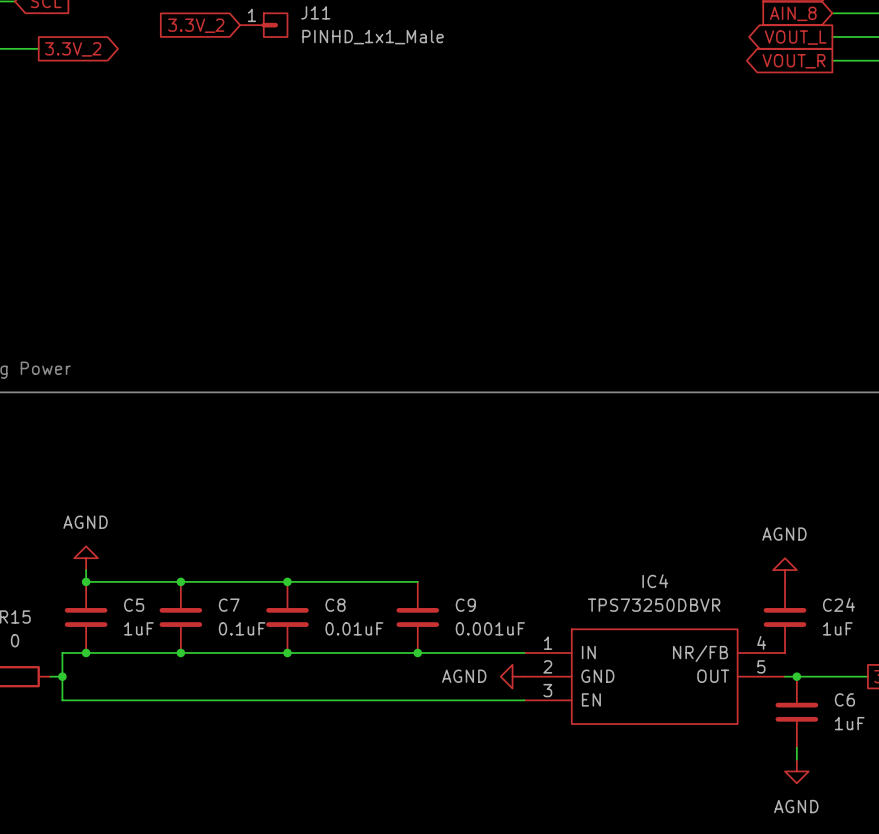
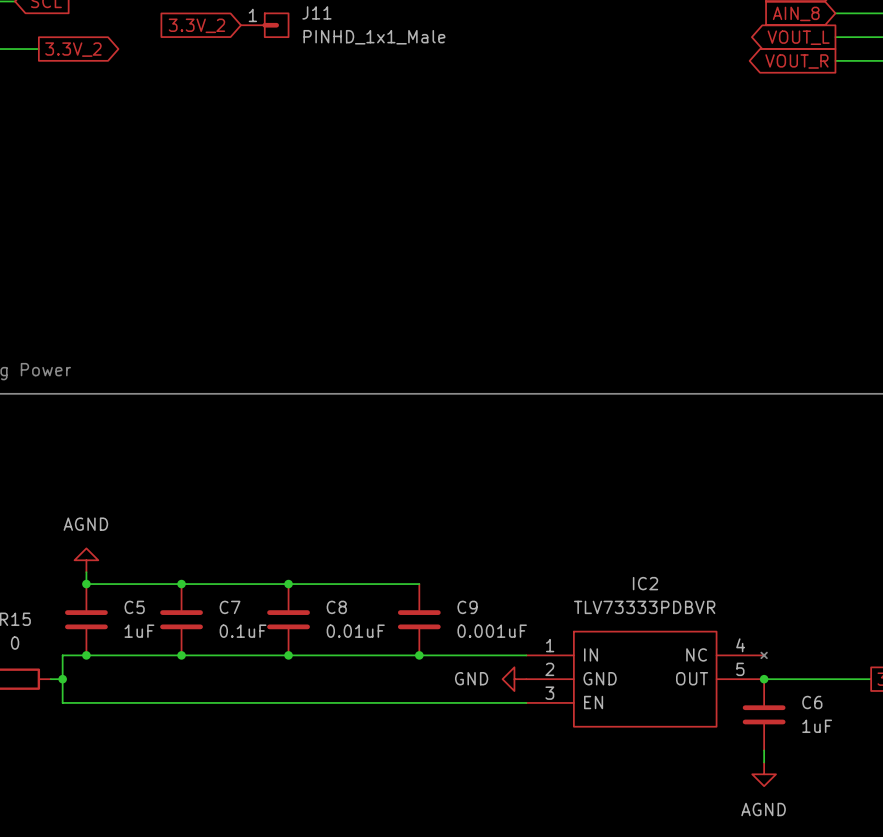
power symbol: AGND (785, 570) -> none
C24: 1uF (785, 617) -> none
power symbol: AGND (512, 676) -> GND (514, 679)
IC2: none -> TLV73333PDBVR (646, 679)
IC4: TPS73250DBVR (654, 676) -> none
junction position: (796, 676) -> (764, 679)
C6 position: (796, 712) -> (764, 714)
wire: (796, 747) (796, 759) -> (764, 750) (764, 762)
power symbol position: AGND (796, 771) -> AGND (764, 774)

